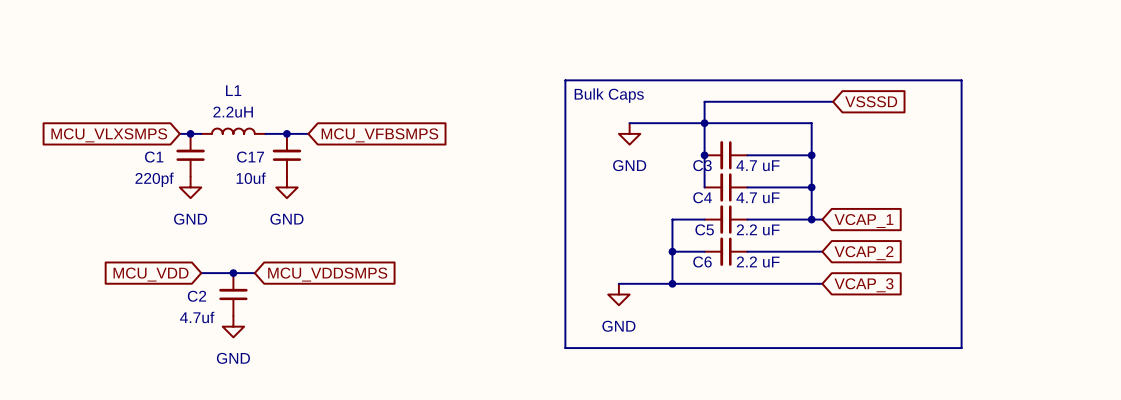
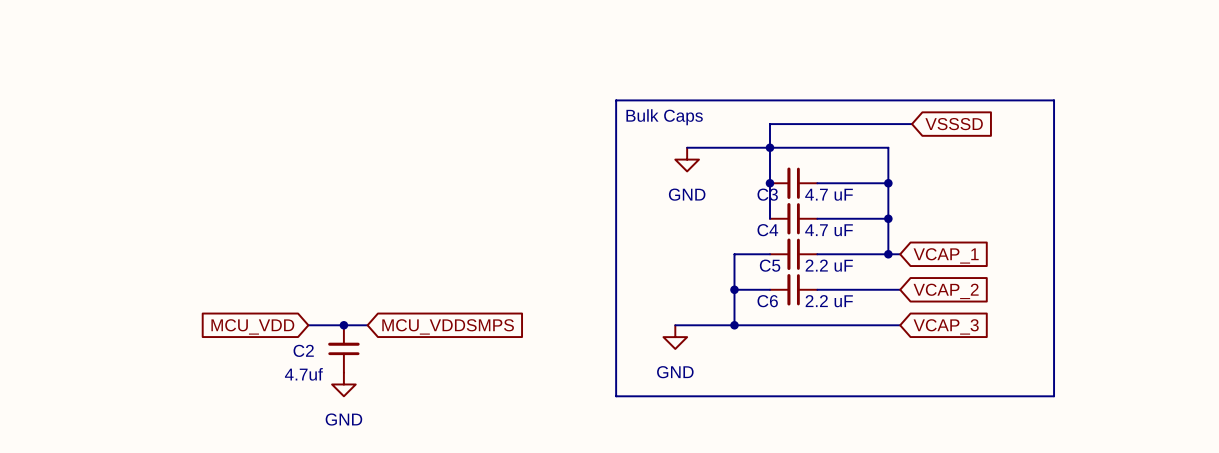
L1: 2.2uH (233, 131) -> none
wire: (179, 133) (201, 133) -> none
junction: (190, 133) -> none
wire: (265, 133) (308, 133) -> none
junction: (286, 133) -> none
global label: MCU_VLXSMPS (109, 135) -> none
global label: MCU_VFBSMPS (379, 135) -> none
C1: 220pf (190, 155) -> none
C17: 10uf (286, 155) -> none
power symbol: GND (190, 187) -> none
power symbol: GND (286, 187) -> none
junction: (233, 273) -> none
global label position: MCU_VDD (151, 274) -> MCU_VDD (252, 326)
global label position: MCU_VDDSMPS (327, 274) -> MCU_VDDSMPS (448, 326)
junction: none -> (343, 325)
C2 position: (233, 294) -> (343, 348)
power symbol: GND (233, 326) -> none
power symbol: none -> GND (343, 384)

